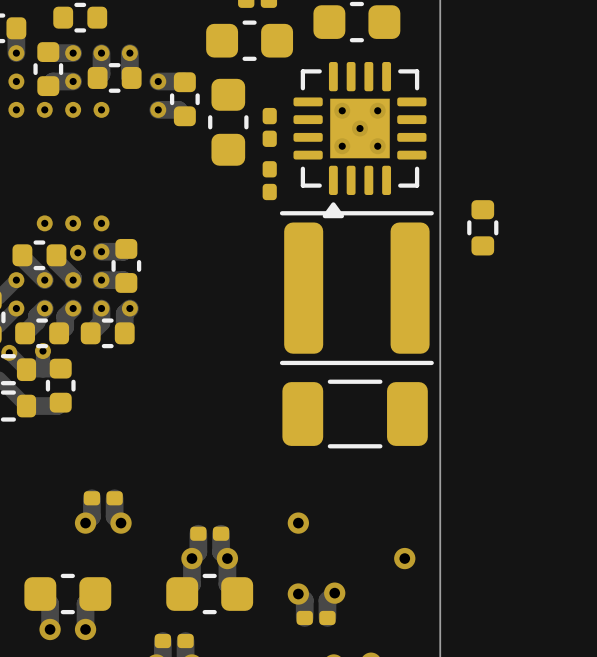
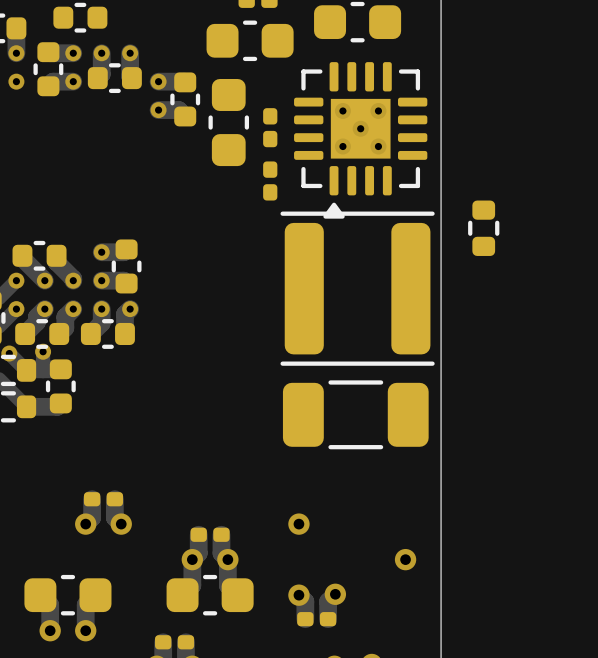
via: (16, 109) -> none
via: (44, 109) -> none
via: (73, 109) -> none
via: (101, 109) -> none
via: (44, 223) -> none
via: (73, 223) -> none
via: (101, 223) -> none
via: (77, 252) -> none

